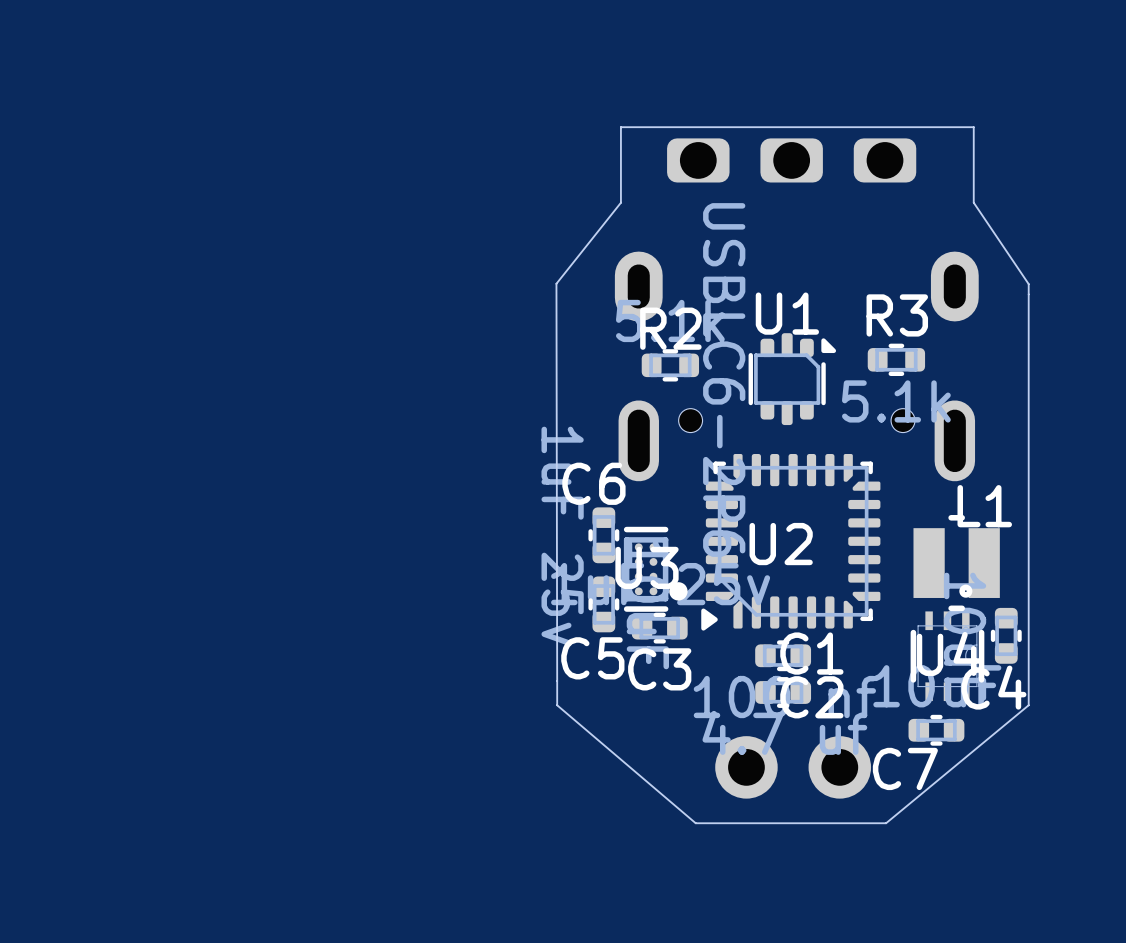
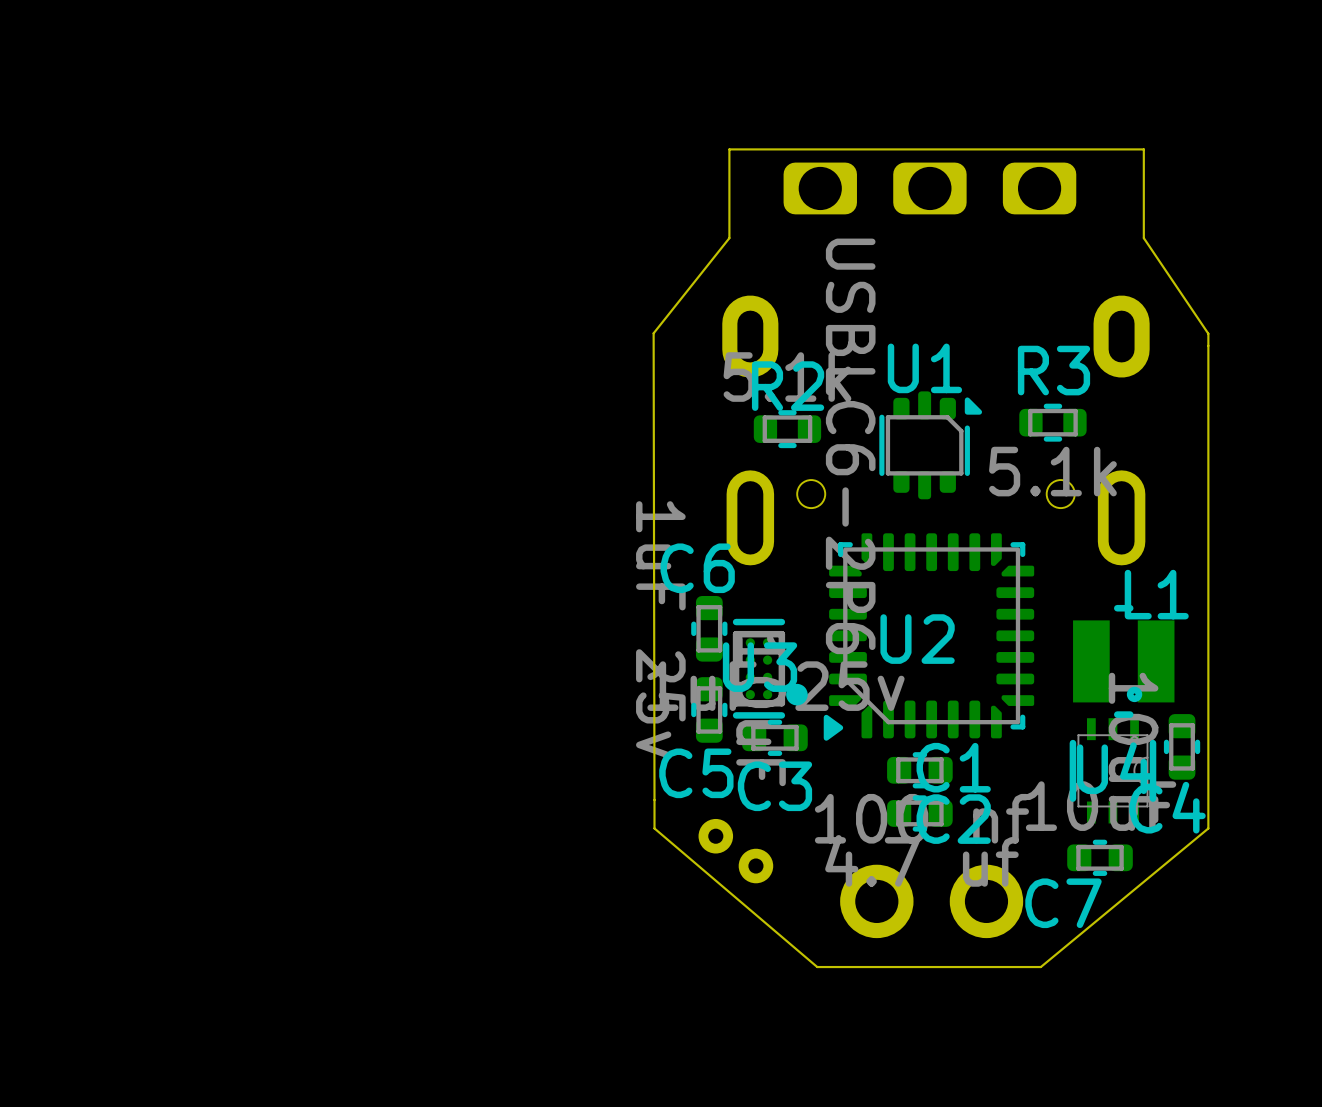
part: none -> (715, 836)
part: none -> (755, 866)

